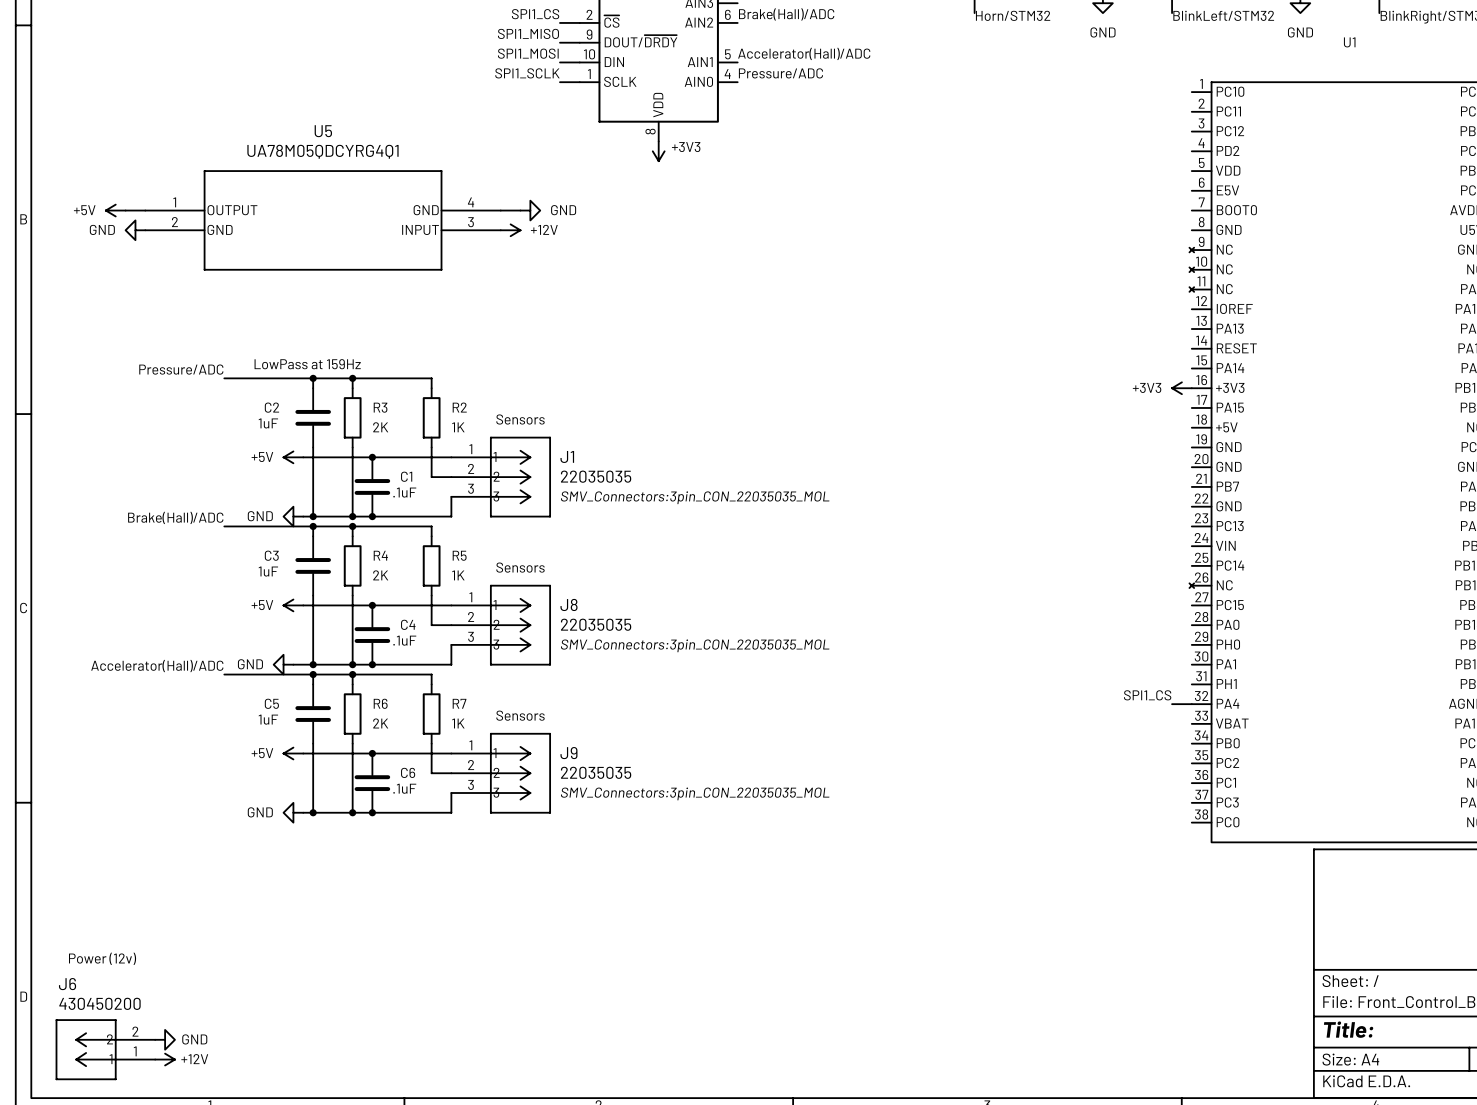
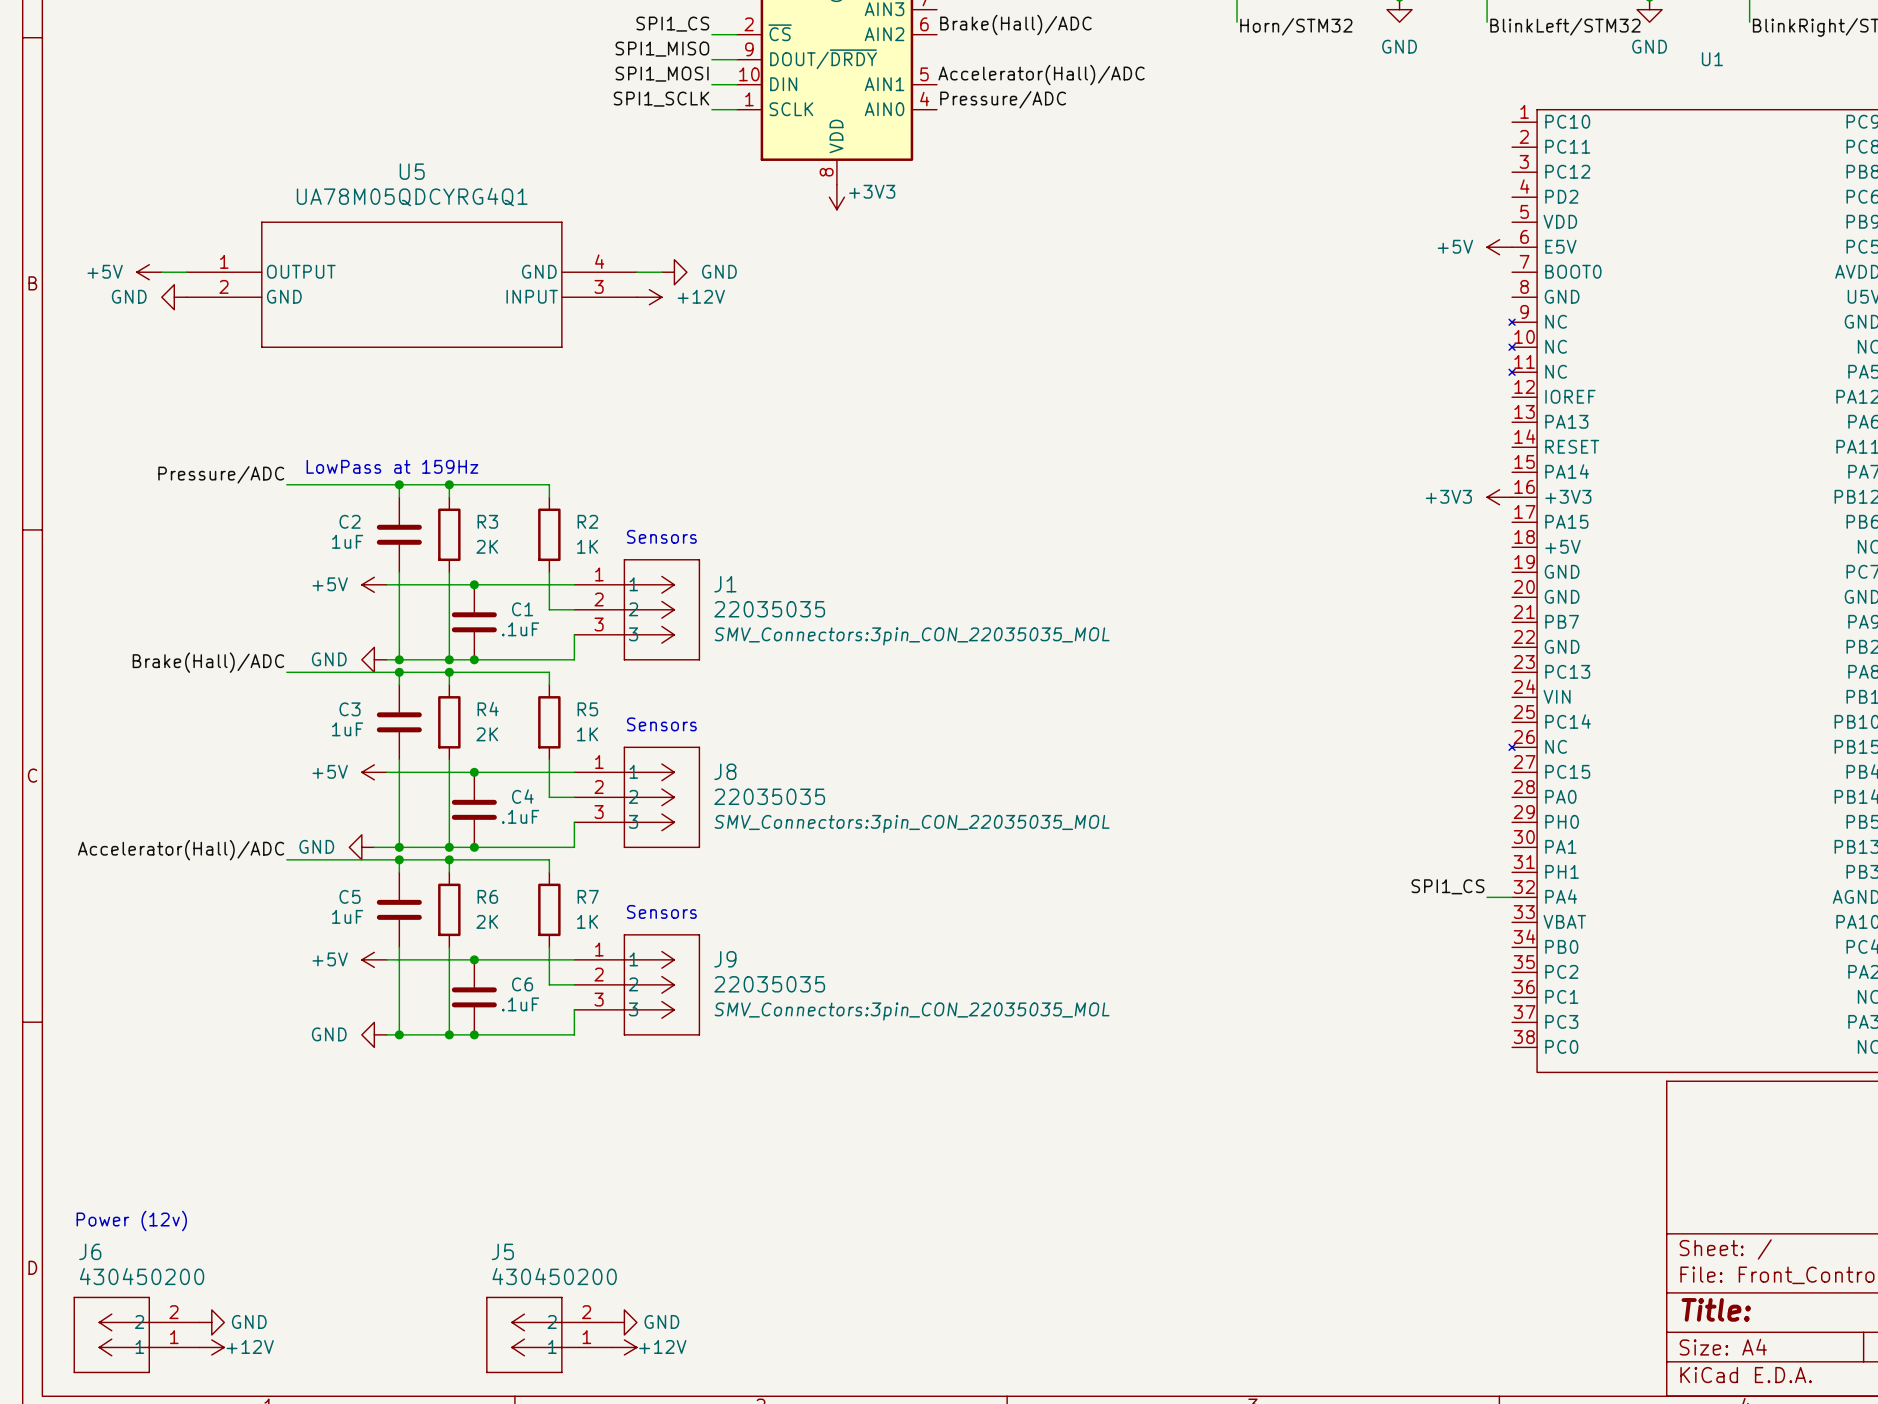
power symbol: none -> +5V (1499, 247)
power symbol: none -> GND (624, 1322)
J5: none -> 430450200 (549, 1334)
power symbol: none -> +12V (624, 1347)

